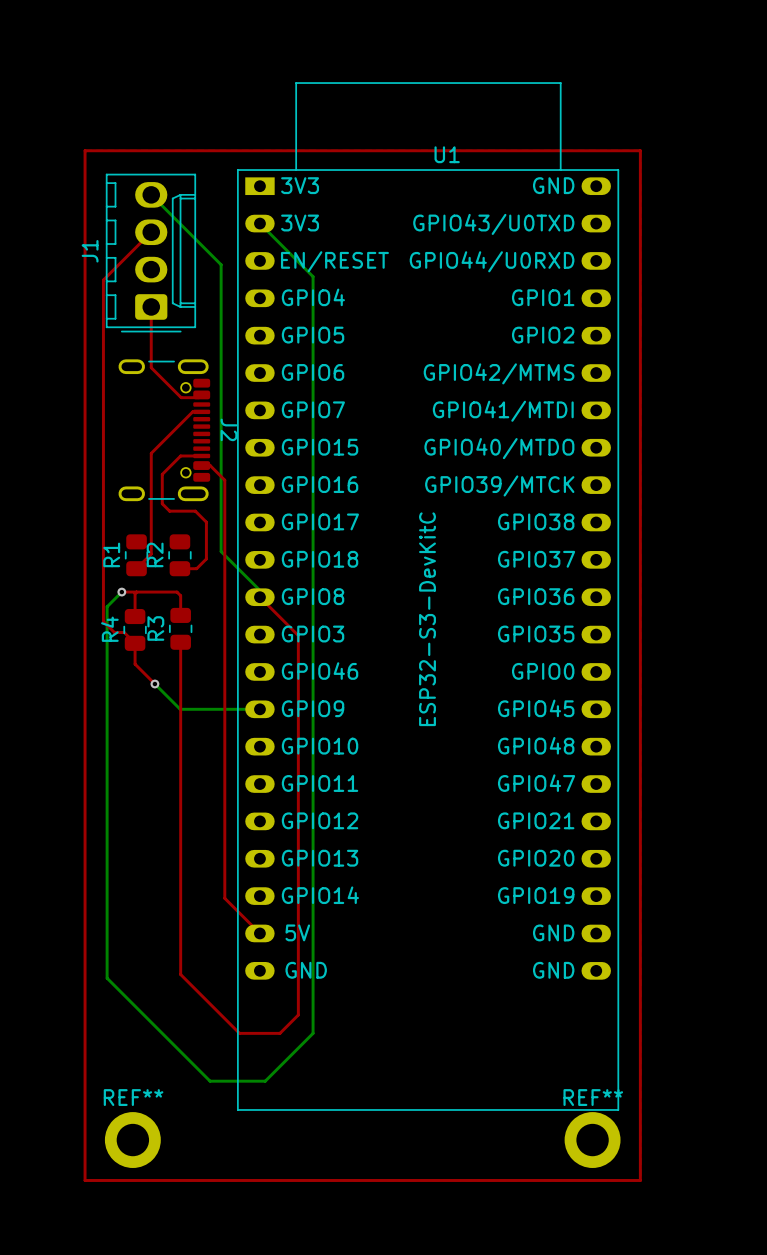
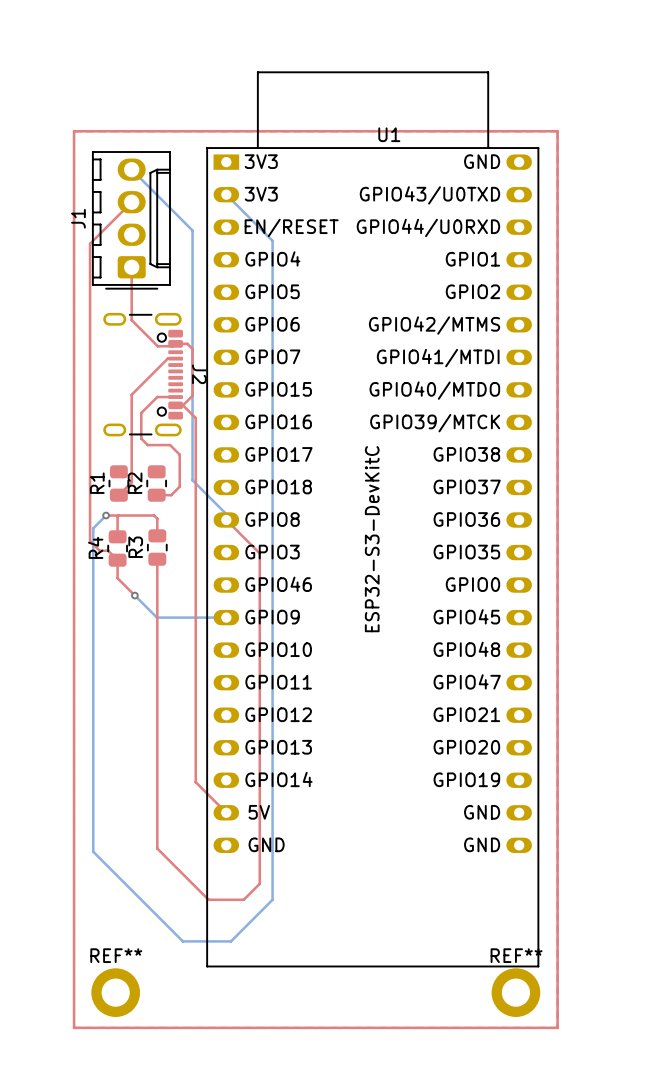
top track: none -> (175, 343) (187, 343) (192, 349) (192, 395) (182, 405)

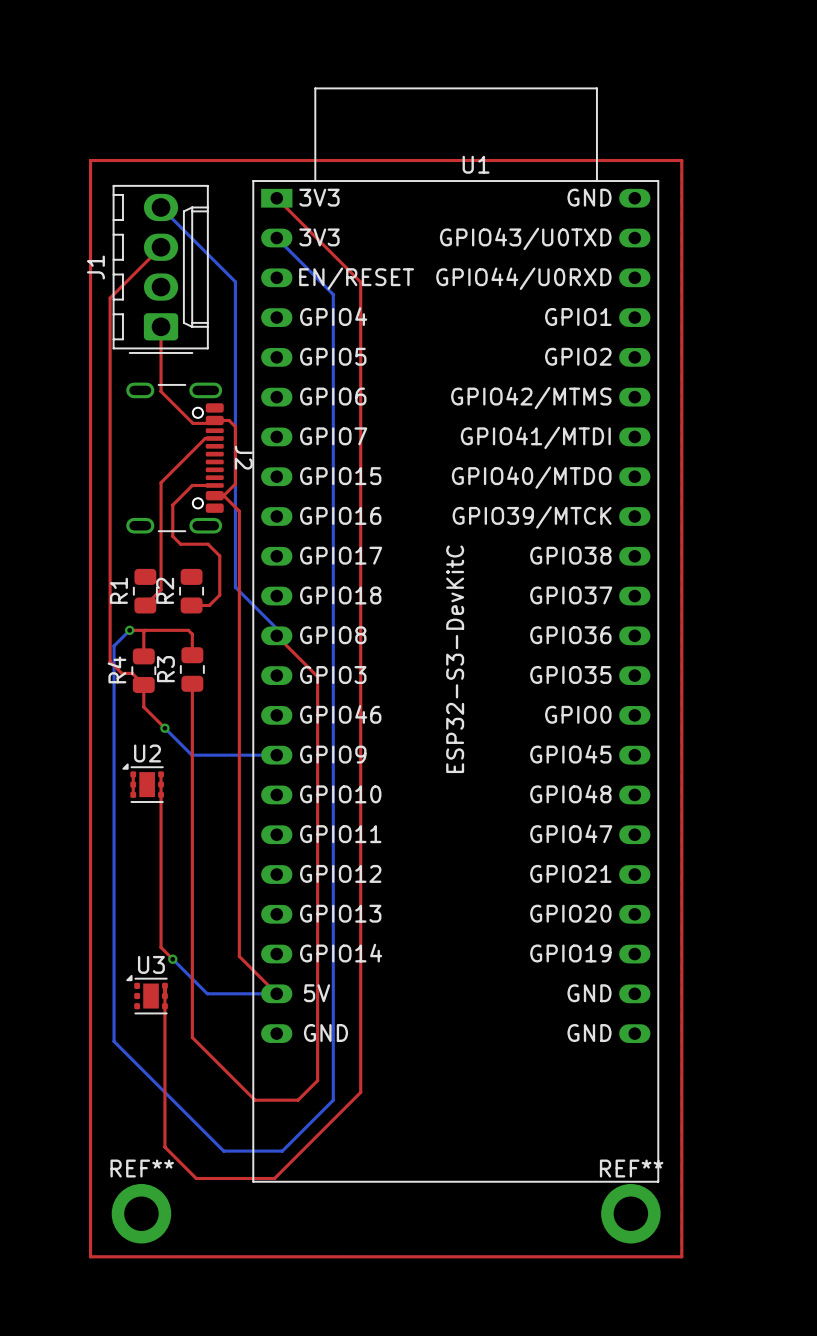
top track: none -> (276, 198) (360, 282) (360, 1092) (274, 1178) (196, 1178) (164, 1147) (164, 985)
top track: none -> (133, 774) (133, 794)
top track: none -> (161, 774) (161, 947) (172, 959)
U2: none -> (143, 783)
bottom track: none -> (172, 959) (207, 993) (276, 993)
via: none -> (172, 959)
U3: none -> (147, 994)

